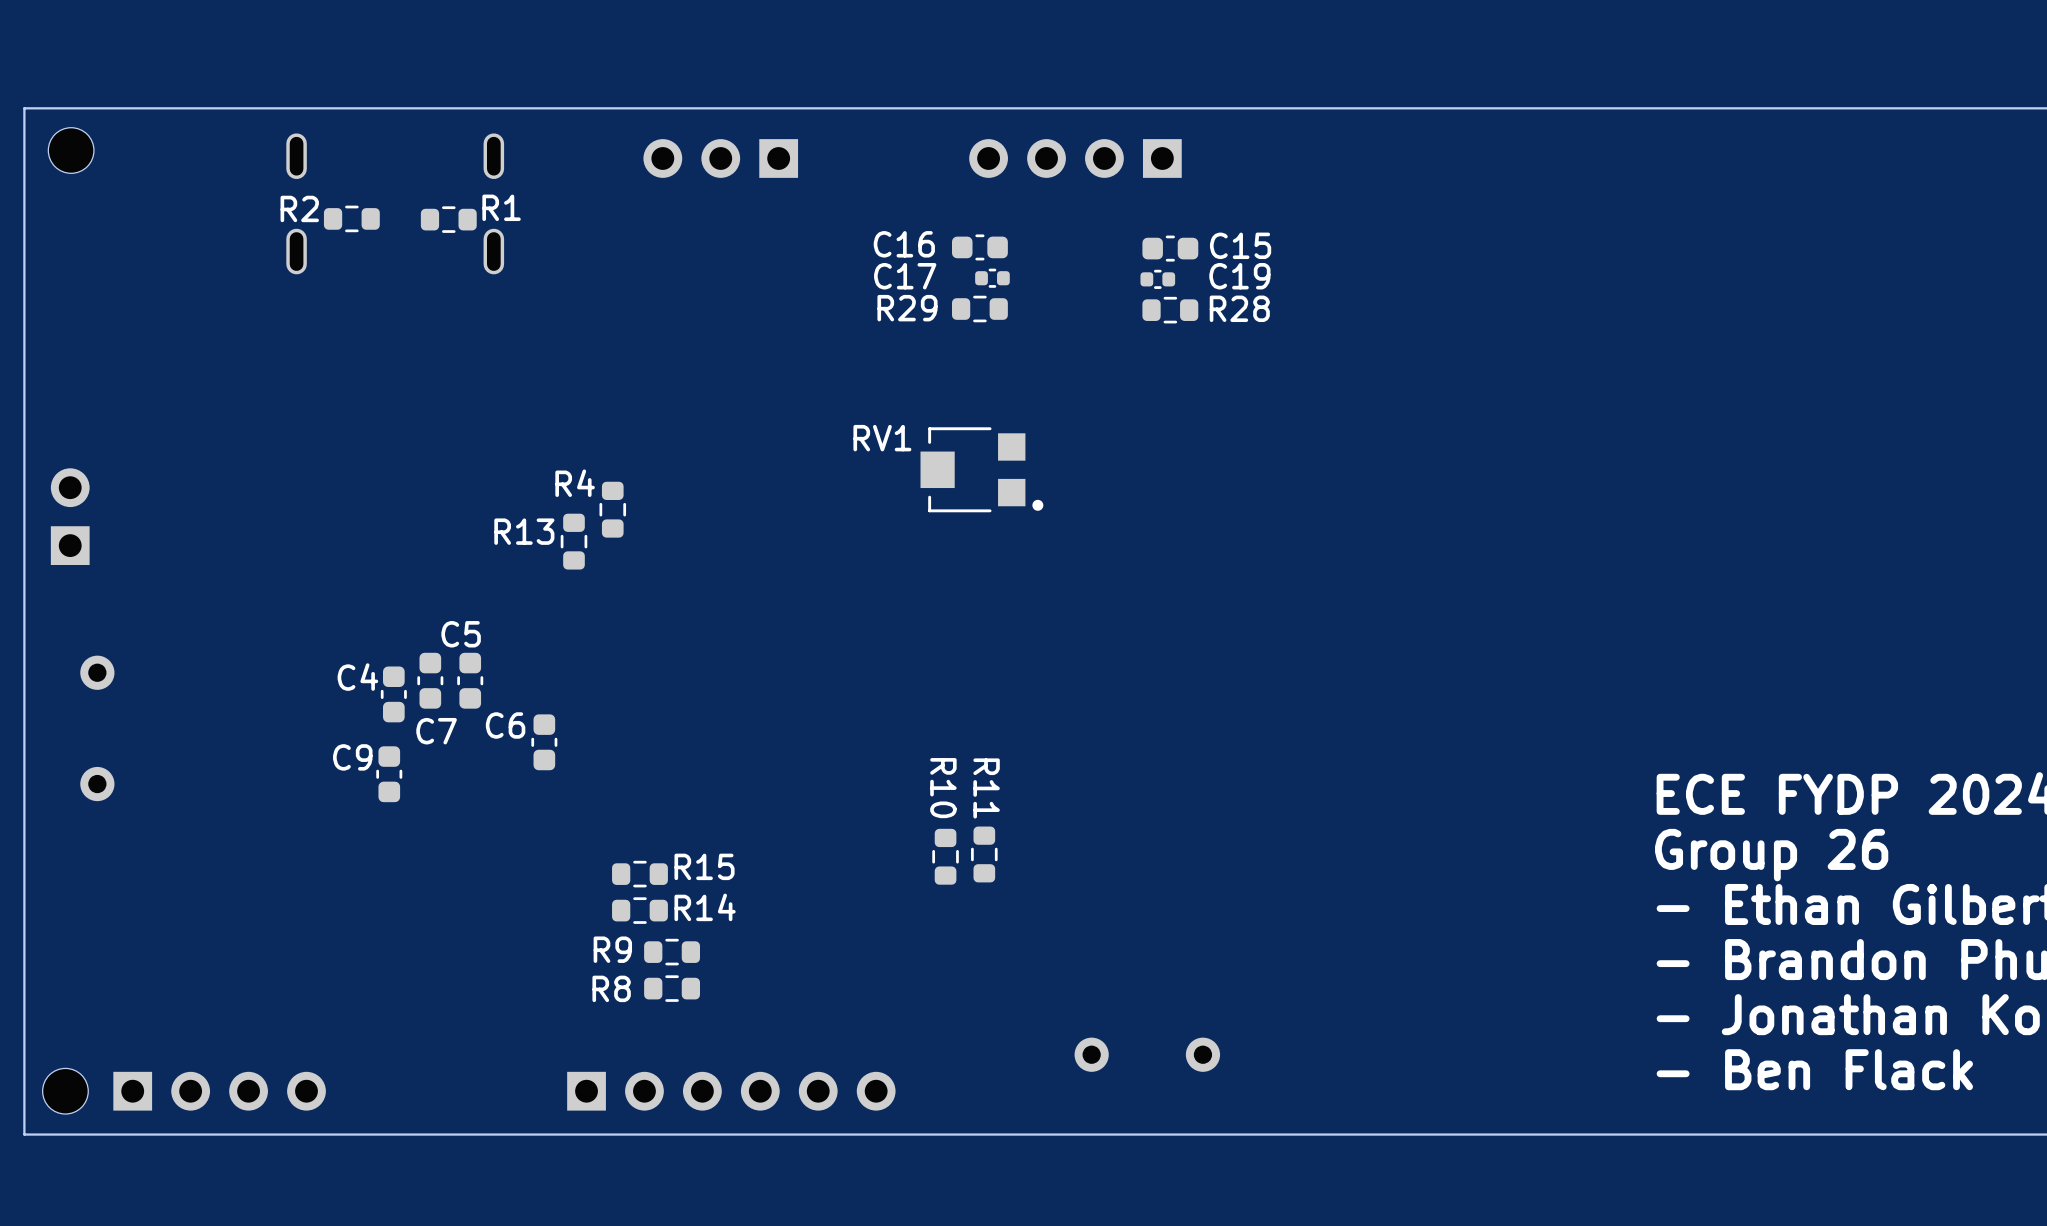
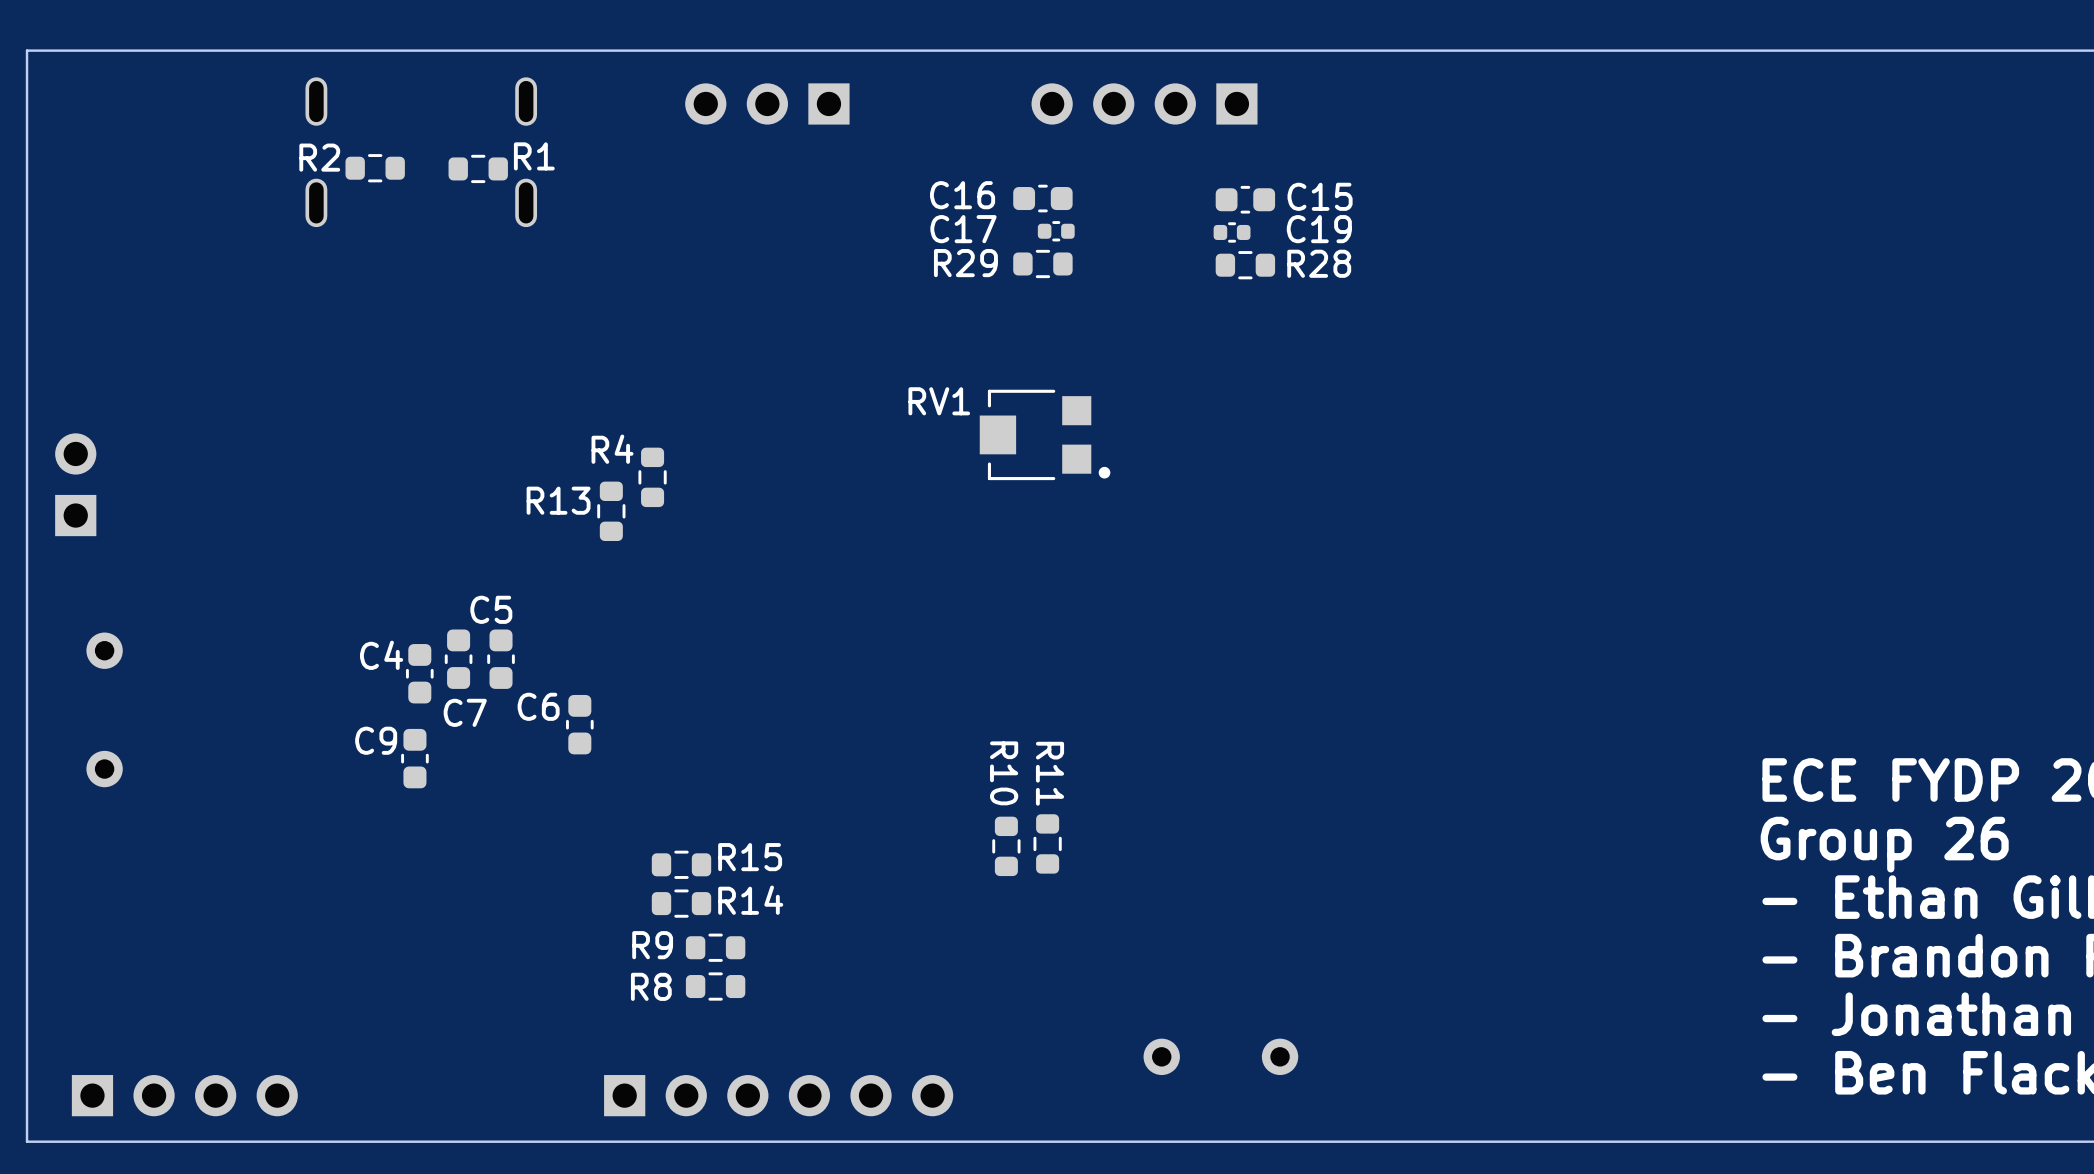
part: (71, 150) -> none
part: (65, 1091) -> none
part position: (219, 1091) -> (184, 1095)

